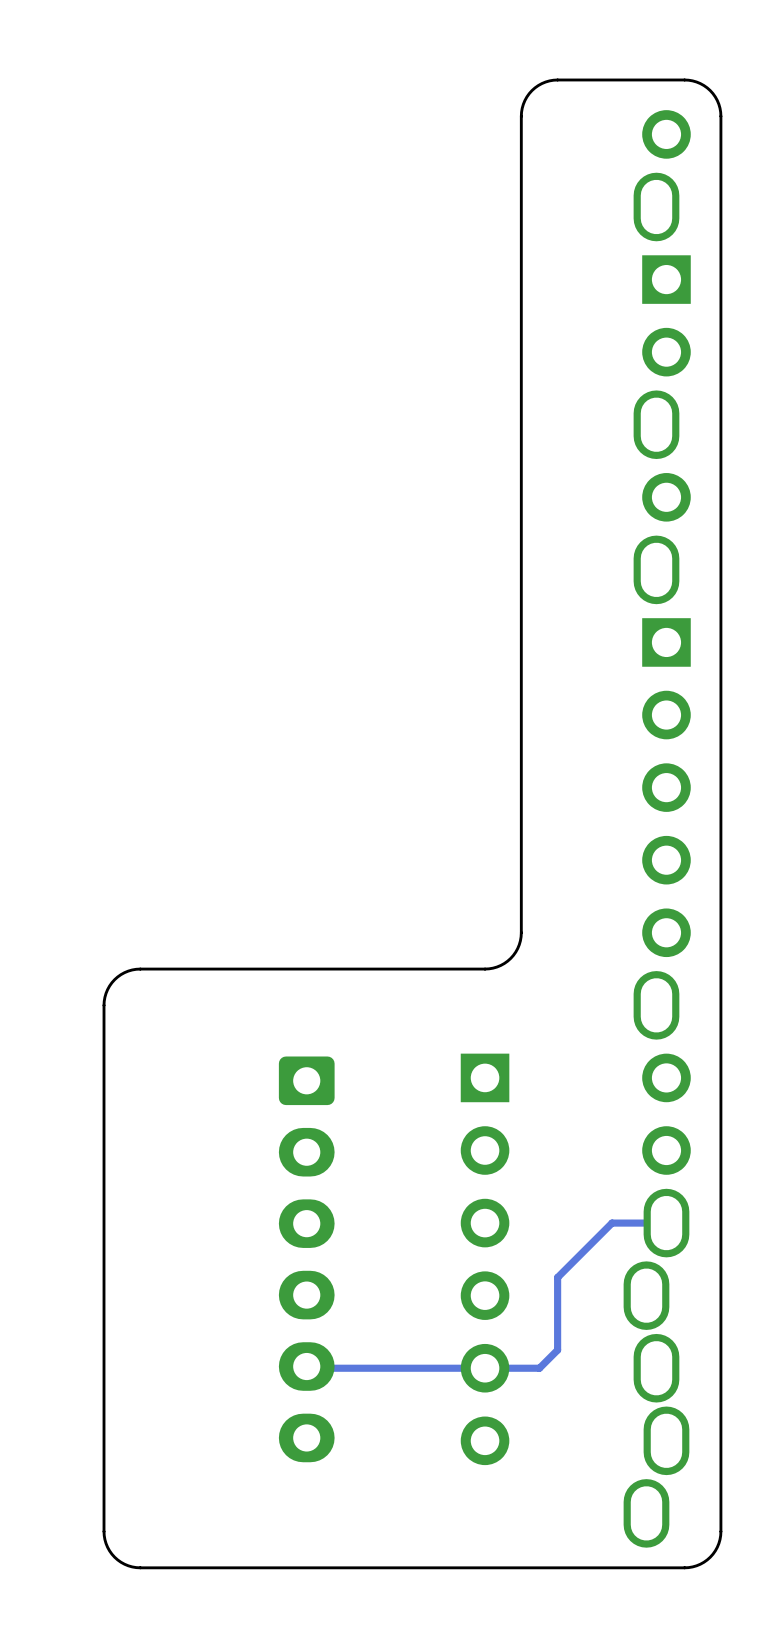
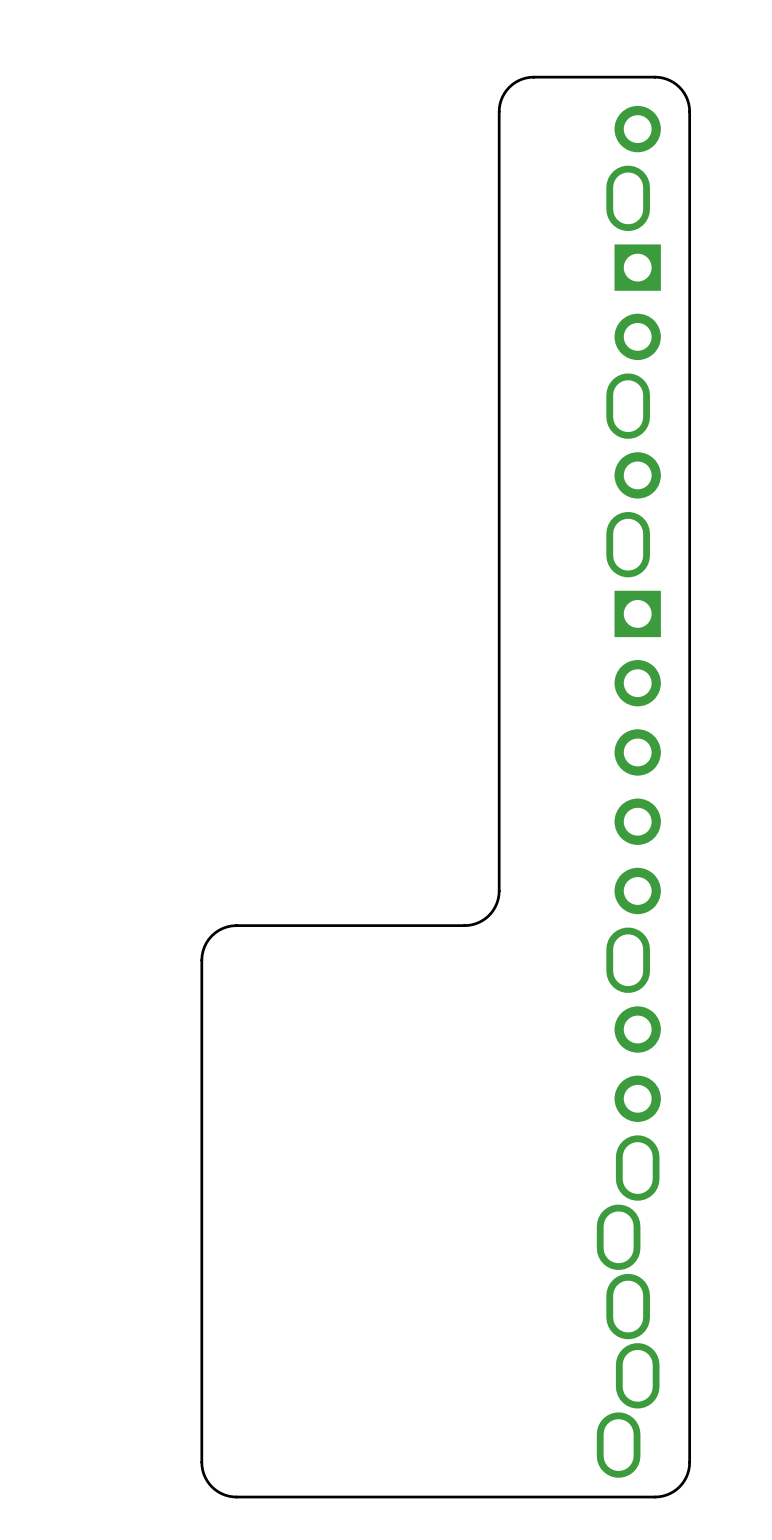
board edge: (246, 969) (132, 969) (120, 974) (111, 982) (106, 993) (104, 1005) (104, 1539) (114, 1557) (132, 1566) (246, 1567) -> (236, 925) (223, 928) (211, 935) (204, 946) (201, 960) (202, 1466) (205, 1477) (211, 1486) (221, 1493) (236, 1497)
track: (666, 1223) (612, 1223) (557, 1277) (557, 1350) (539, 1368) (308, 1368) (306, 1366) -> none
part: (306, 1259) -> none
part: (485, 1259) -> none

